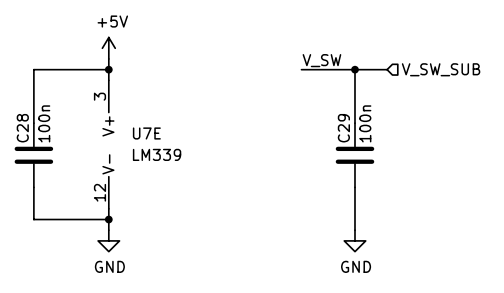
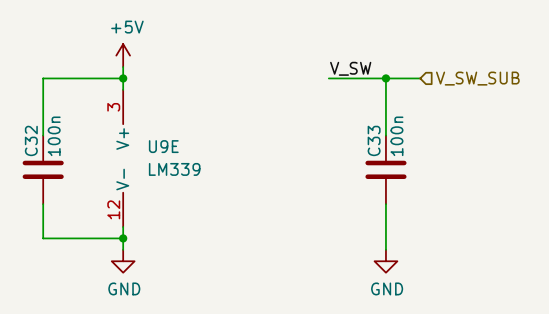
C28 name: C28 (22, 128) -> C32 (31, 140)
C29 name: C29 (343, 128) -> C33 (374, 140)
U7E name: U7E (146, 133) -> U9E (163, 146)

